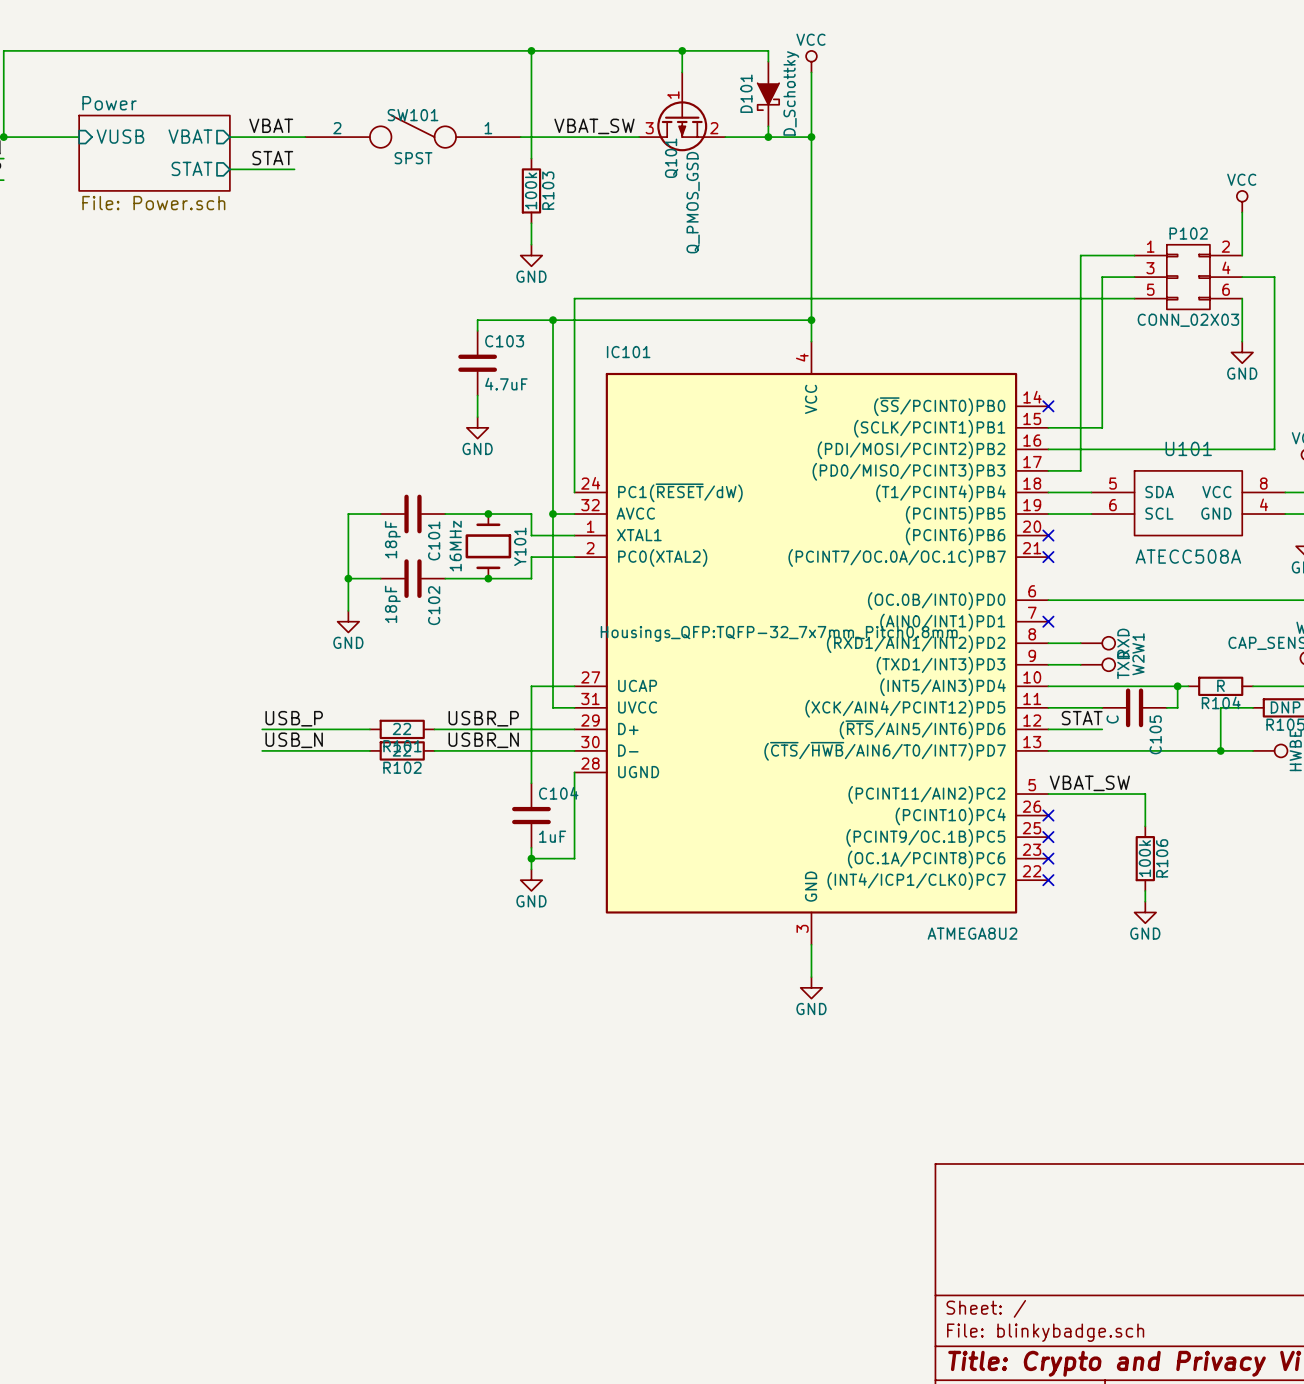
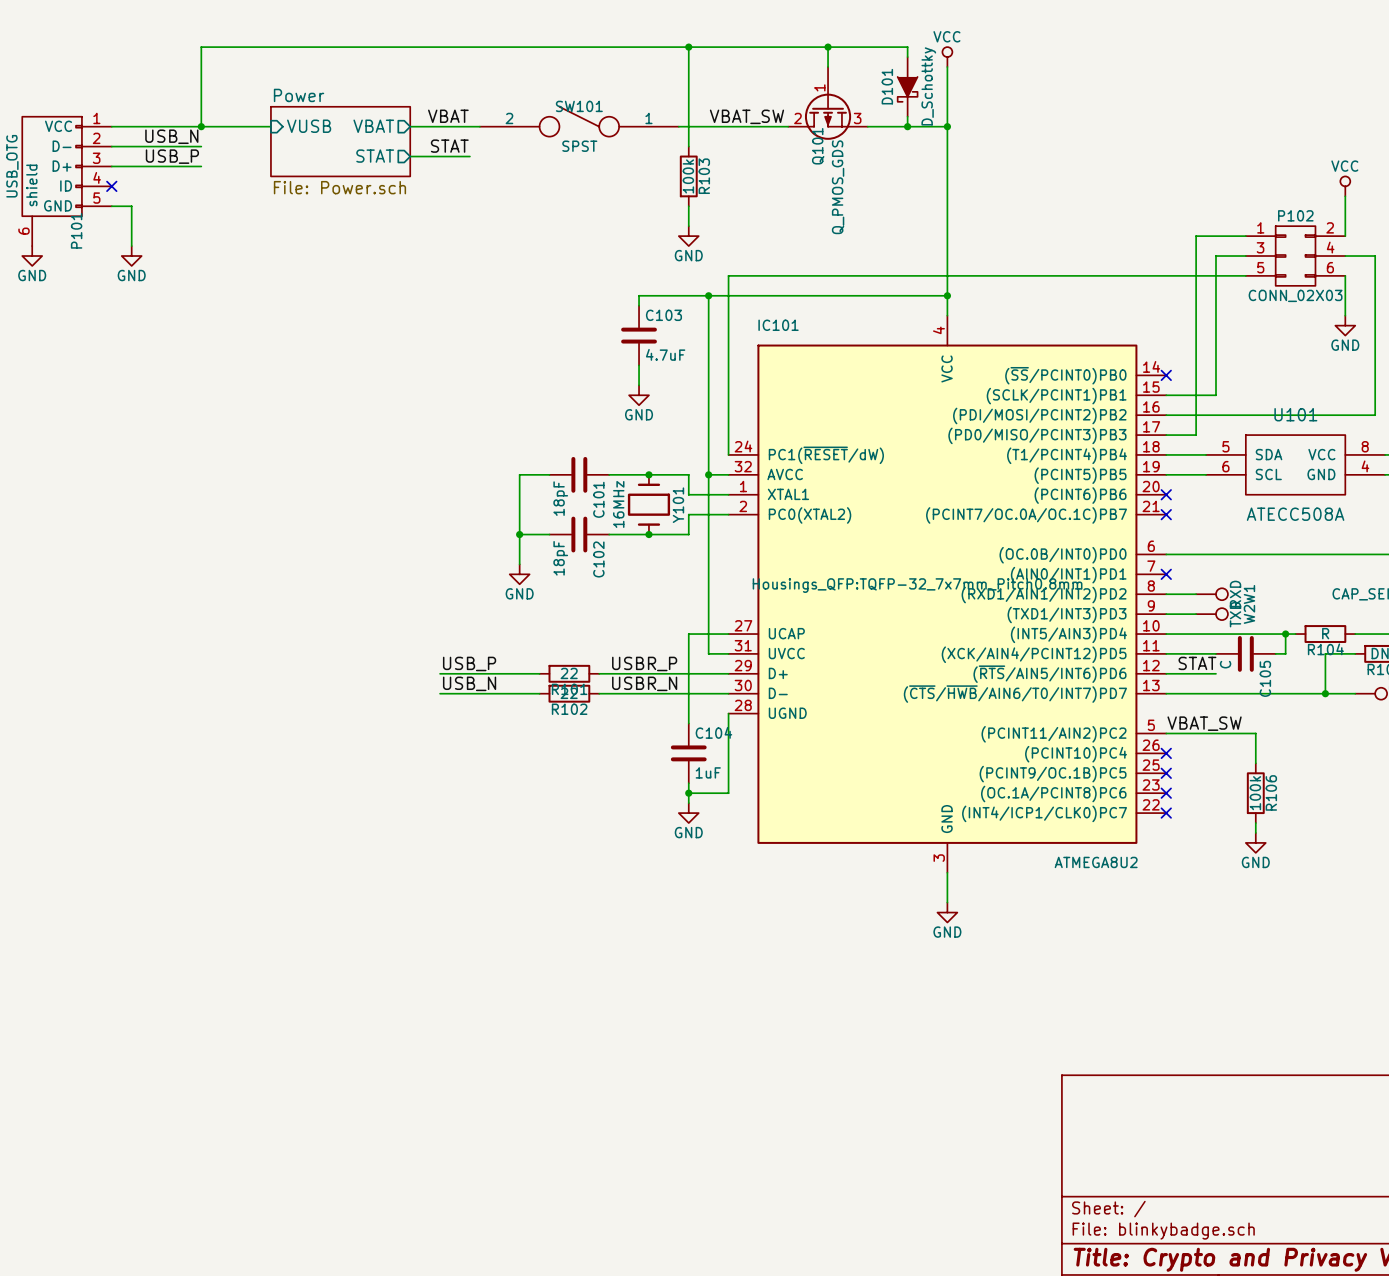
Q101 pin number: 3 (649, 128) -> 2 (797, 118)
Q101 pin number: 2 (714, 128) -> 3 (857, 118)
Q101 value: Q_PMOS_GSD (693, 202) -> Q_PMOS_GDS (838, 187)

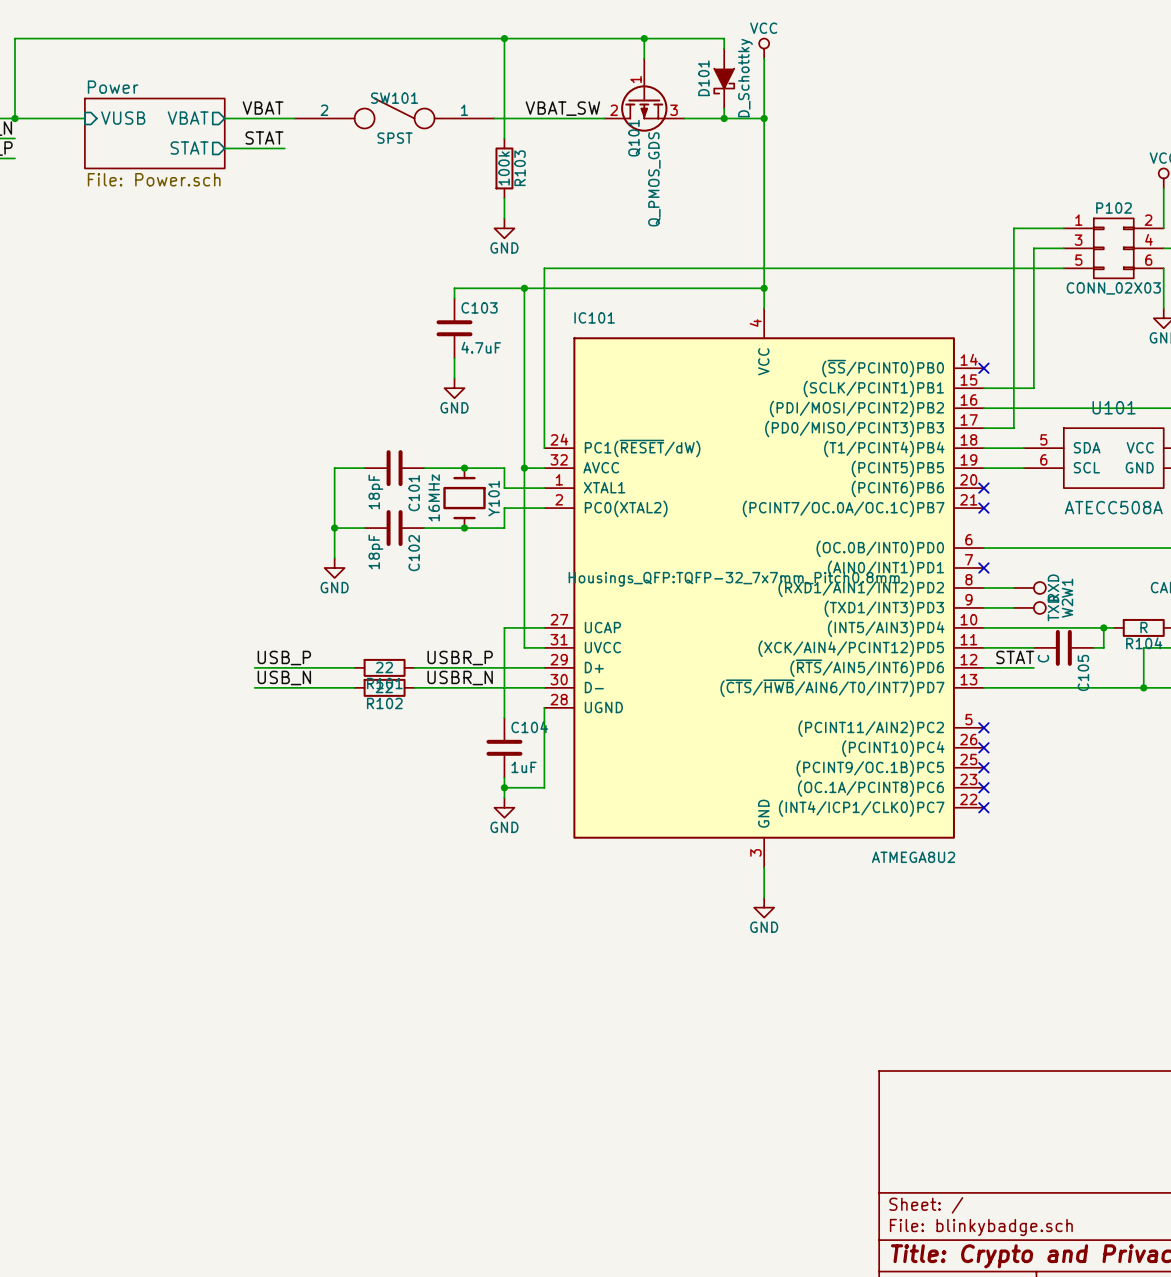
label: VBAT_SW (1204, 723) -> none
wire: (1166, 733) (1255, 733) (1255, 763) -> none
no-connect mark: none -> (983, 727)
R106: 100k (1255, 793) -> none
wire: (1255, 823) (1255, 832) -> none
power symbol: GND (1255, 842) -> none

